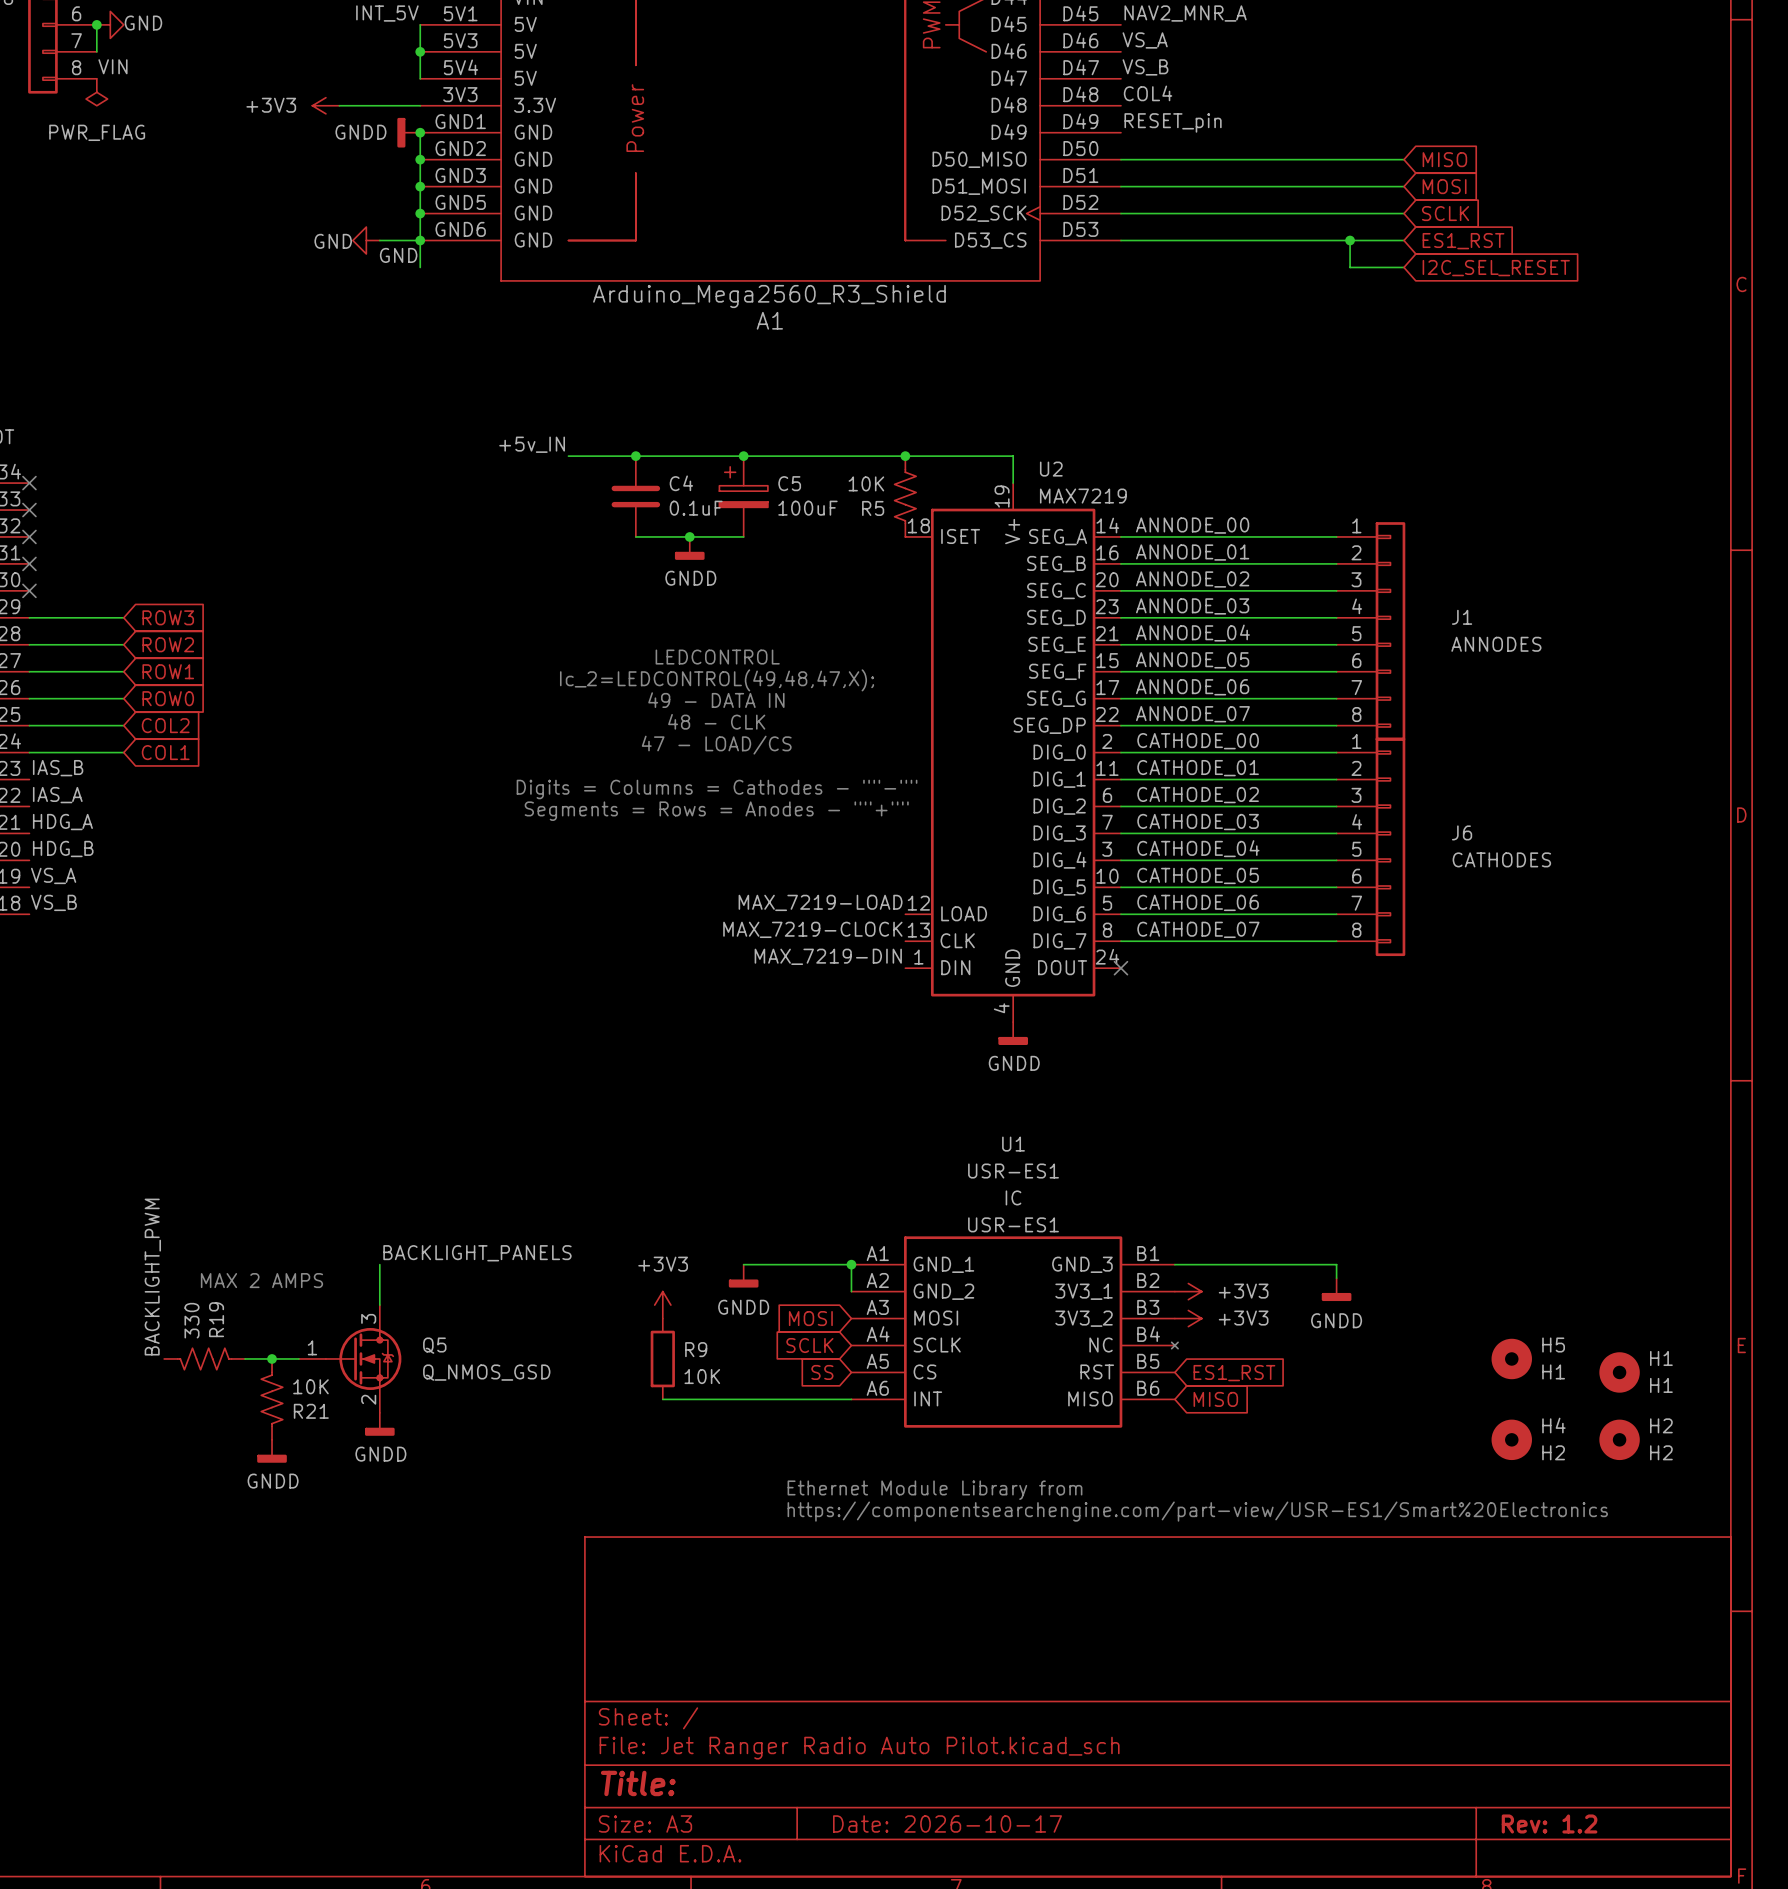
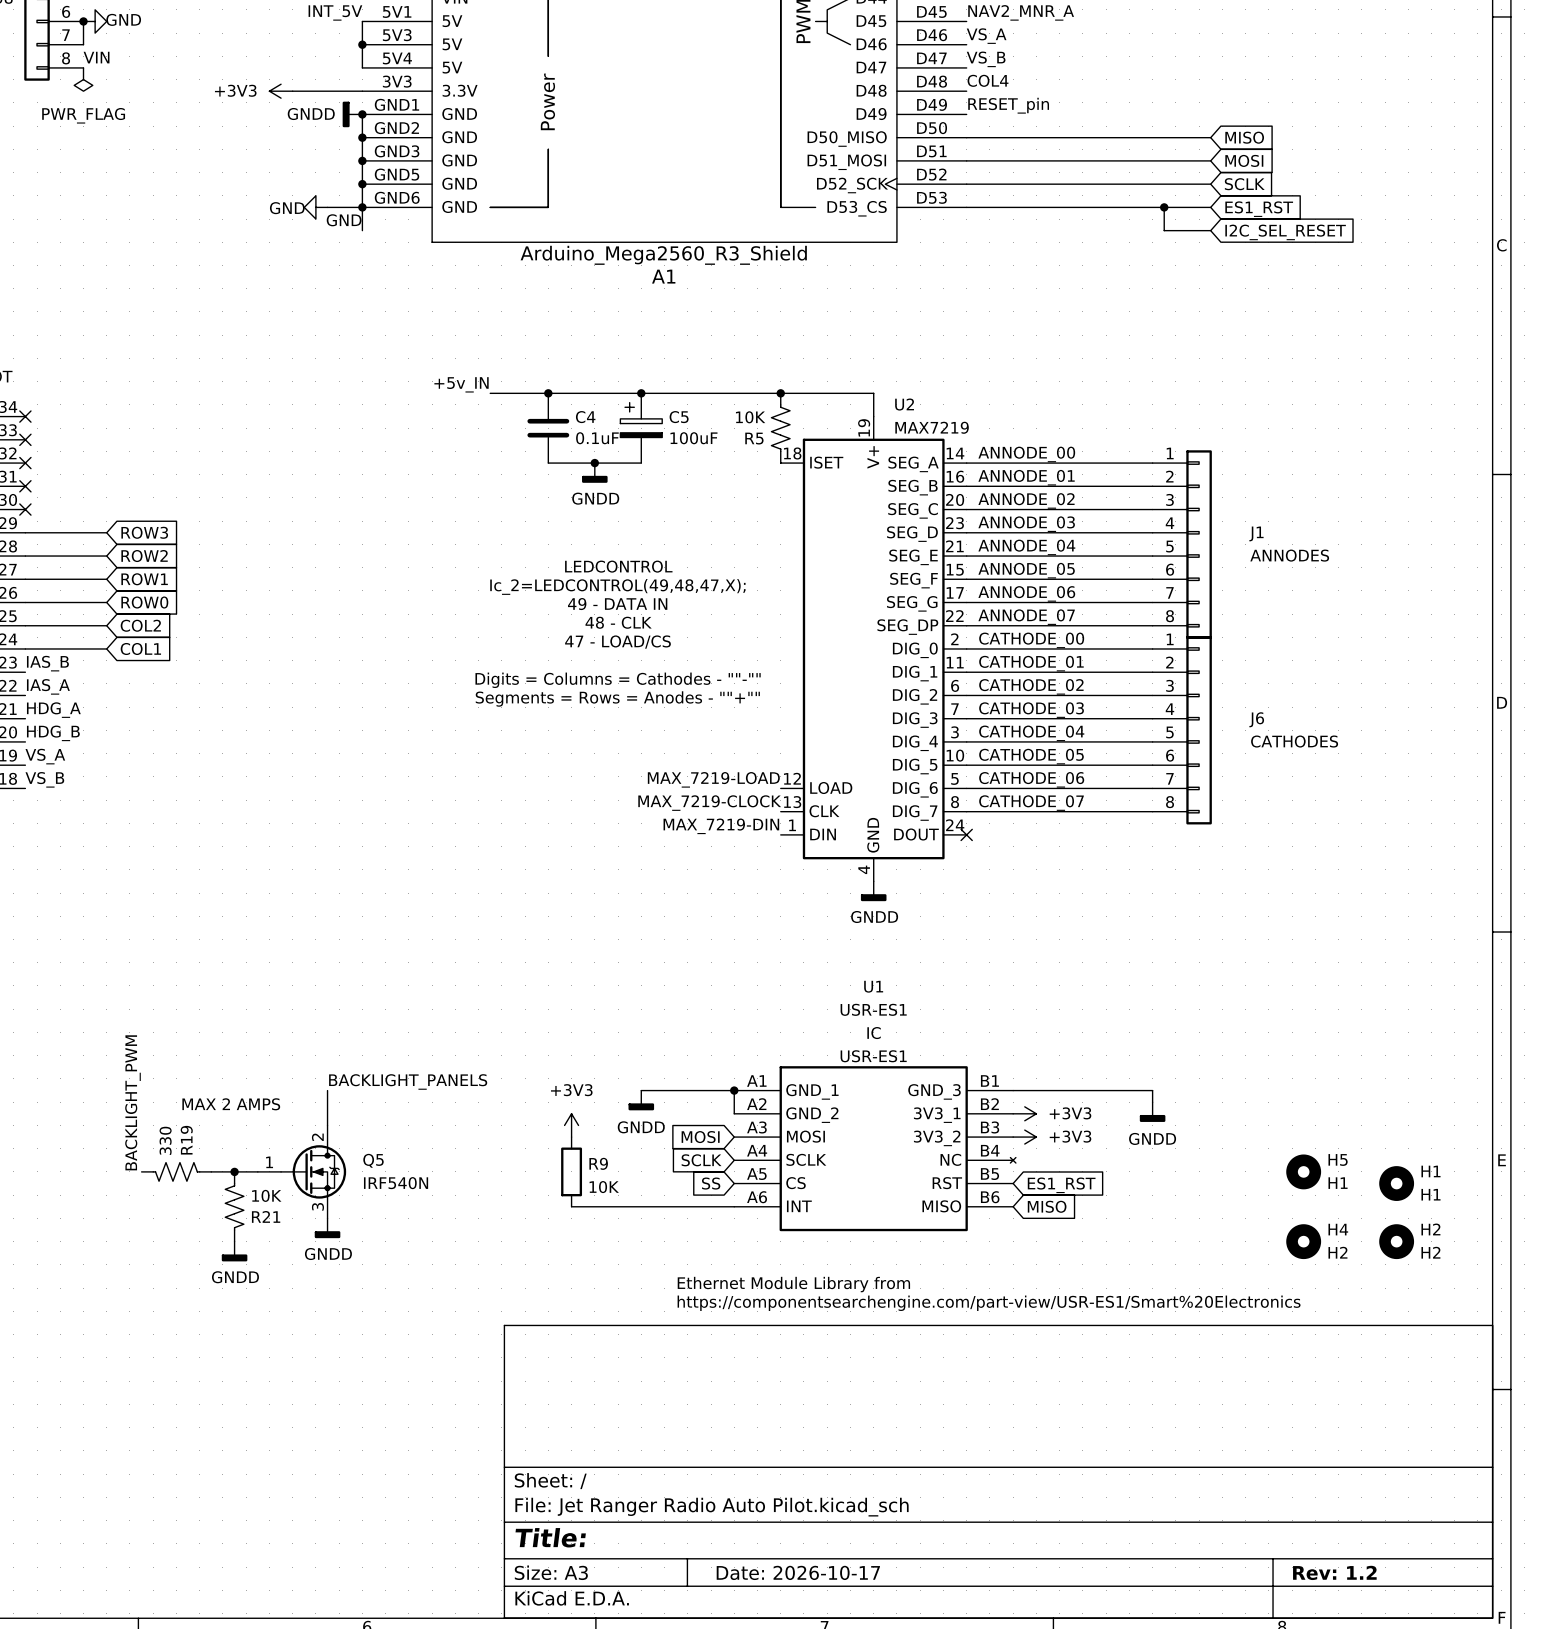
Q5 pin number: 3 (368, 1318) -> 2 (317, 1137)
Q5 value: Q_NMOS_GSD (486, 1372) -> IRF540N (396, 1183)
Q5 pin number: 2 (368, 1399) -> 3 (317, 1206)

